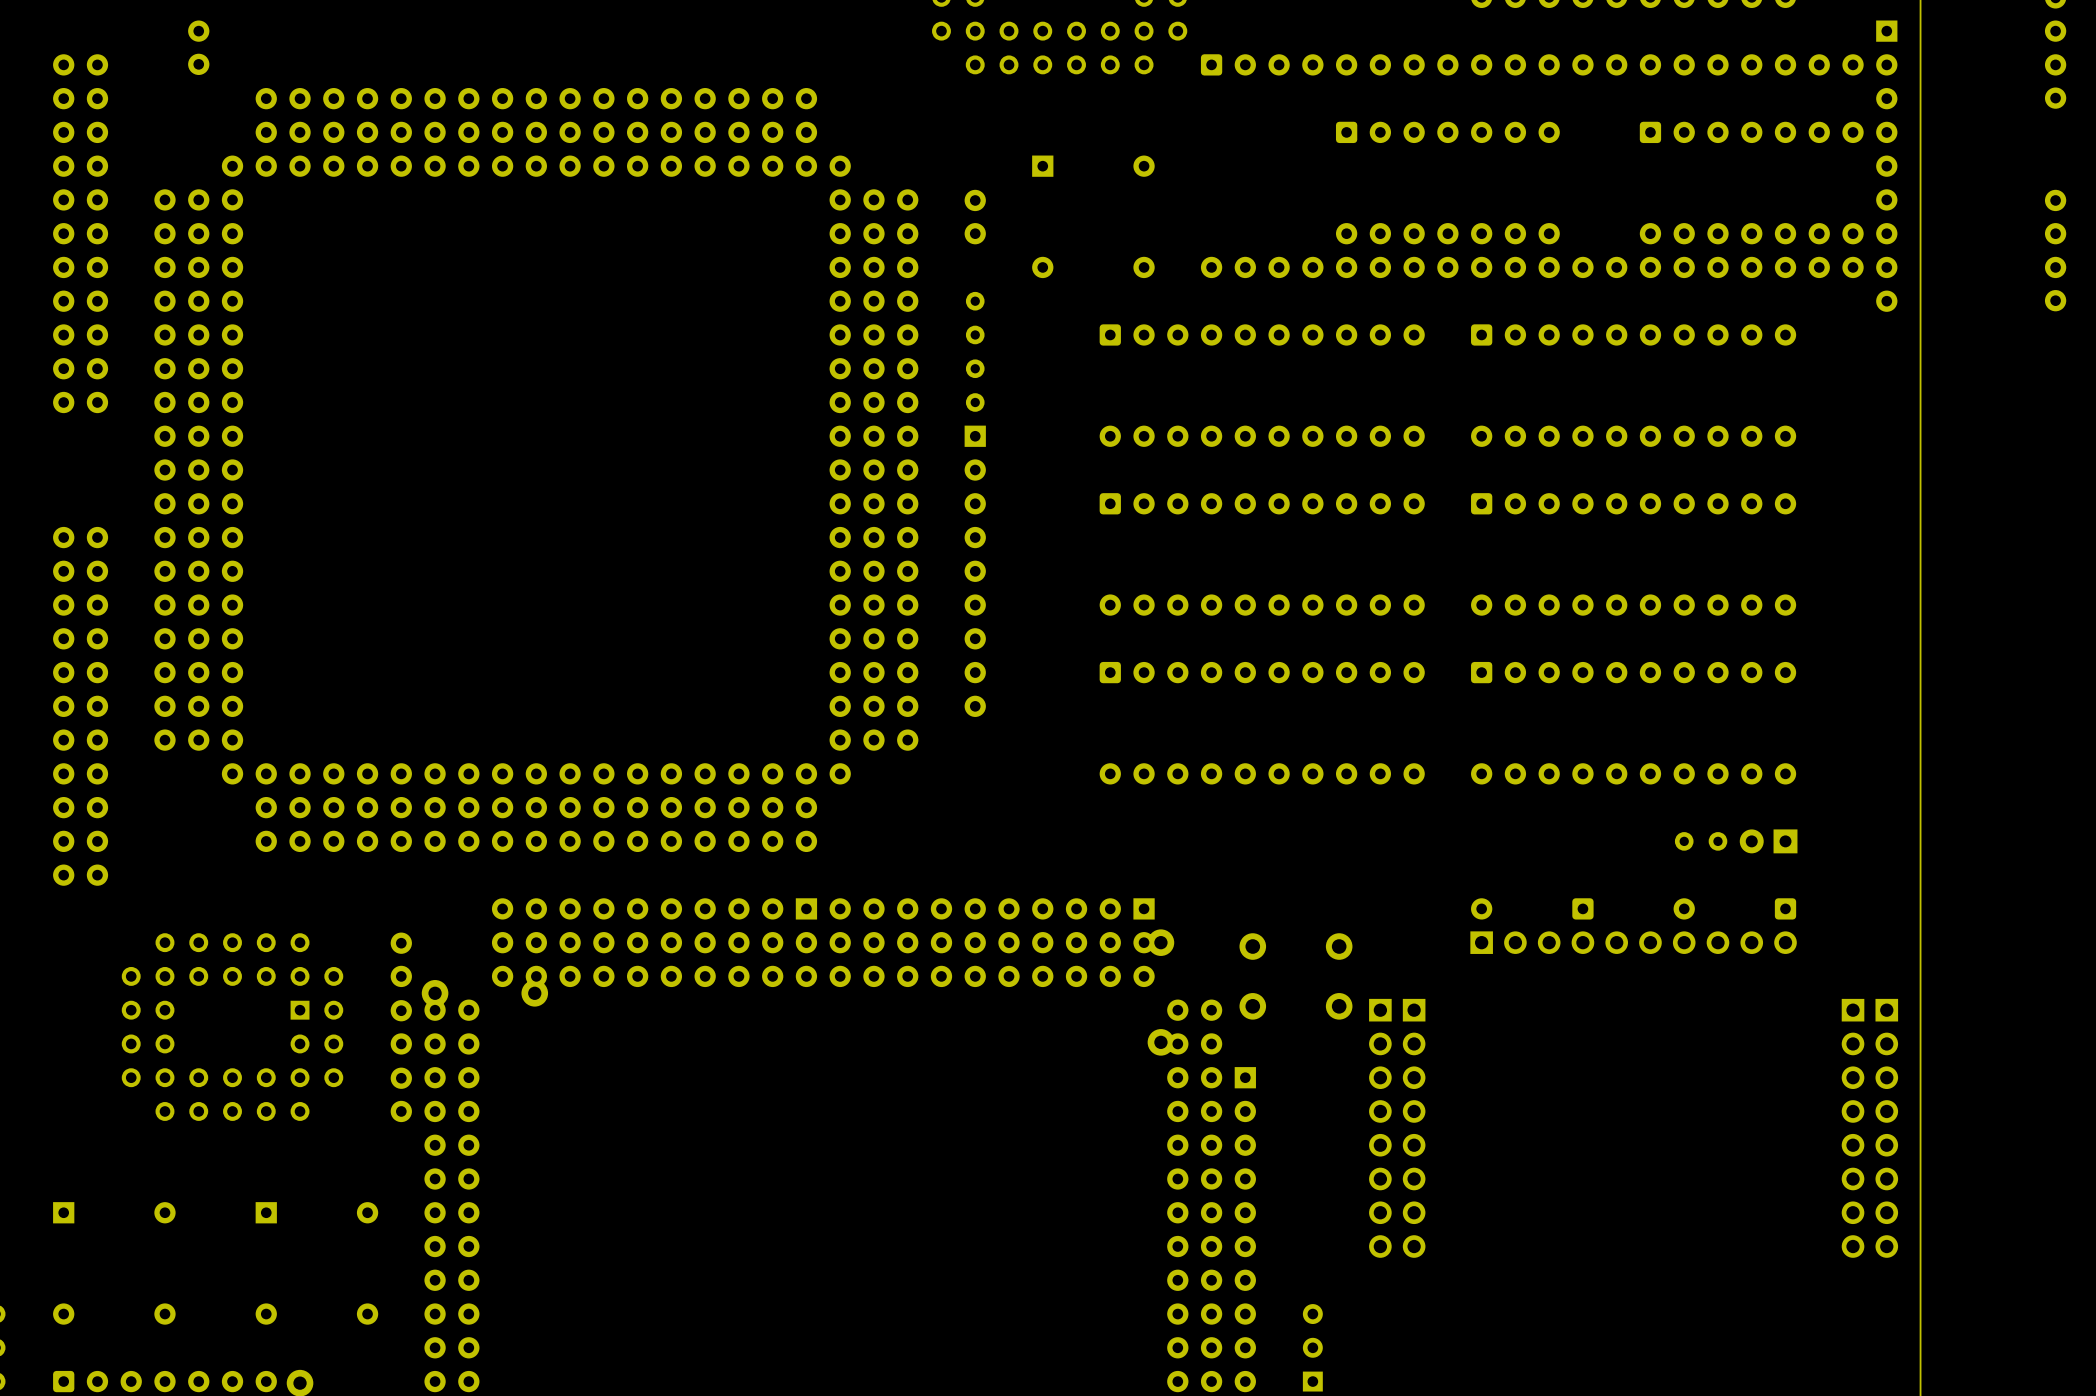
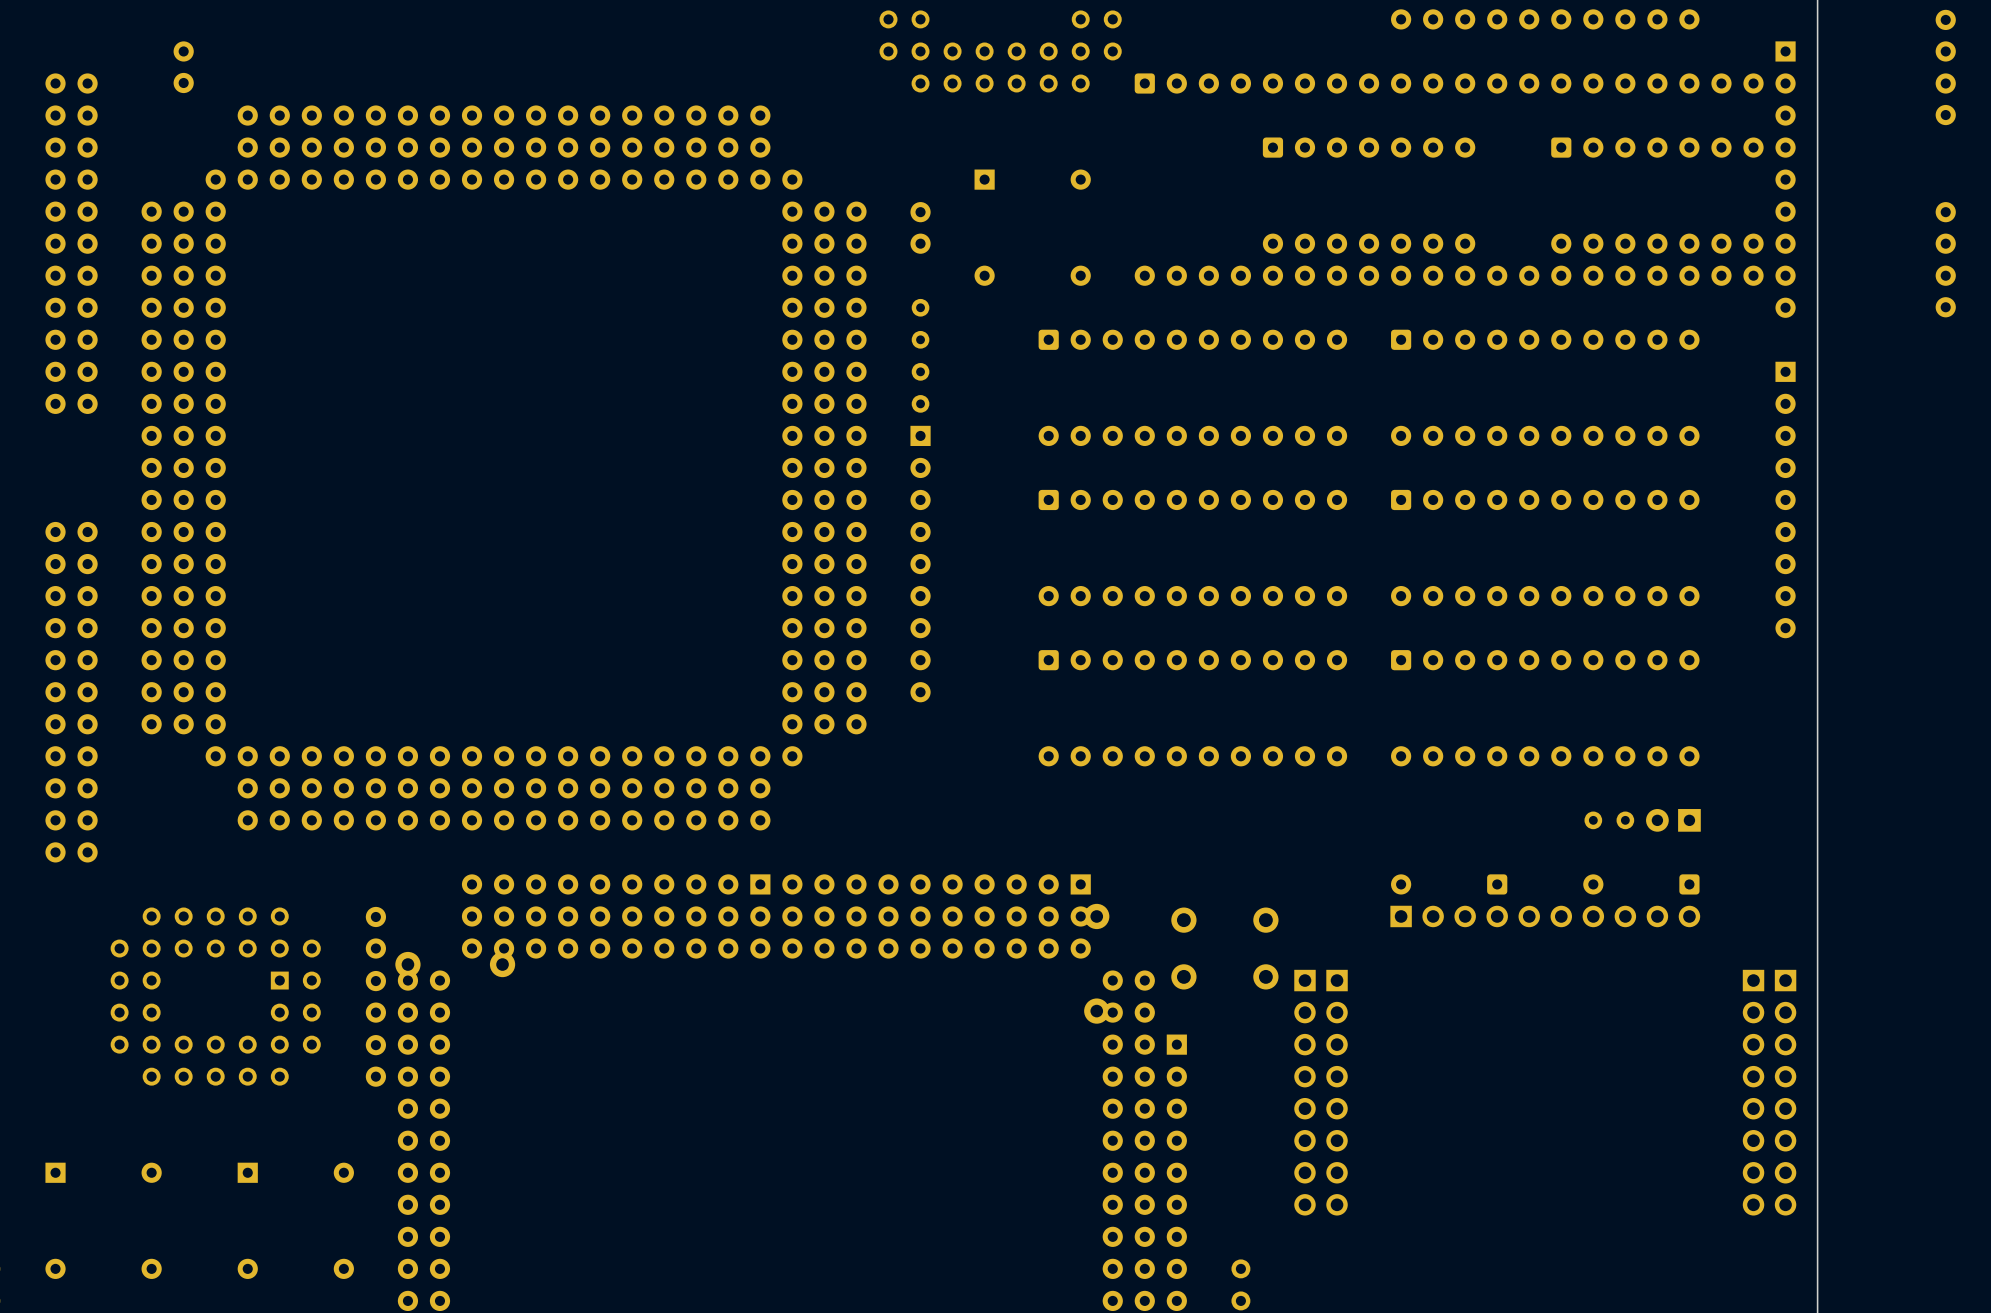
part: none -> (1785, 499)

